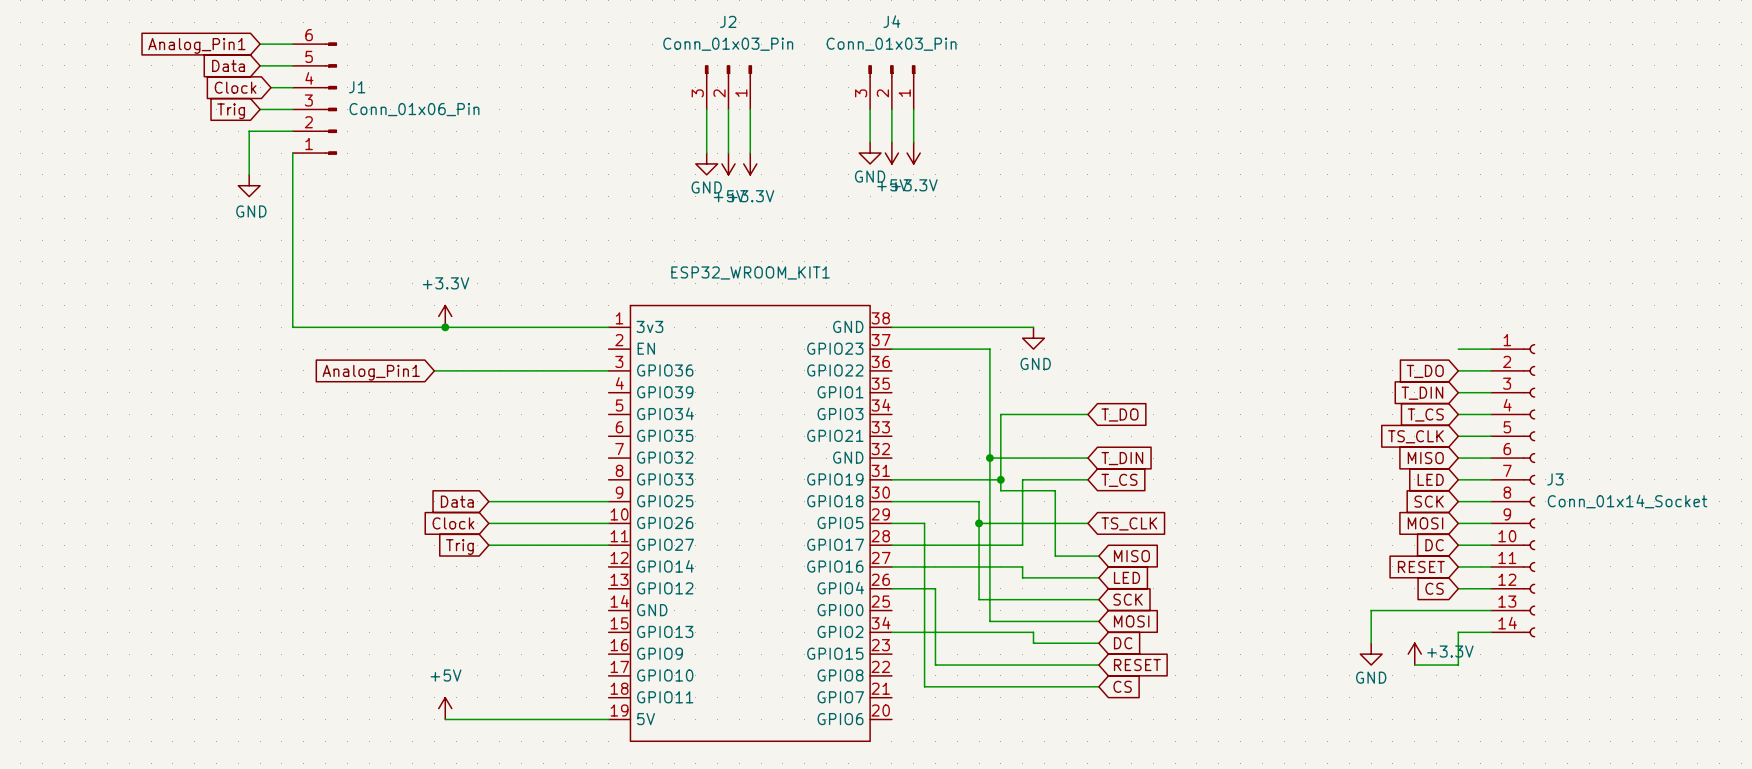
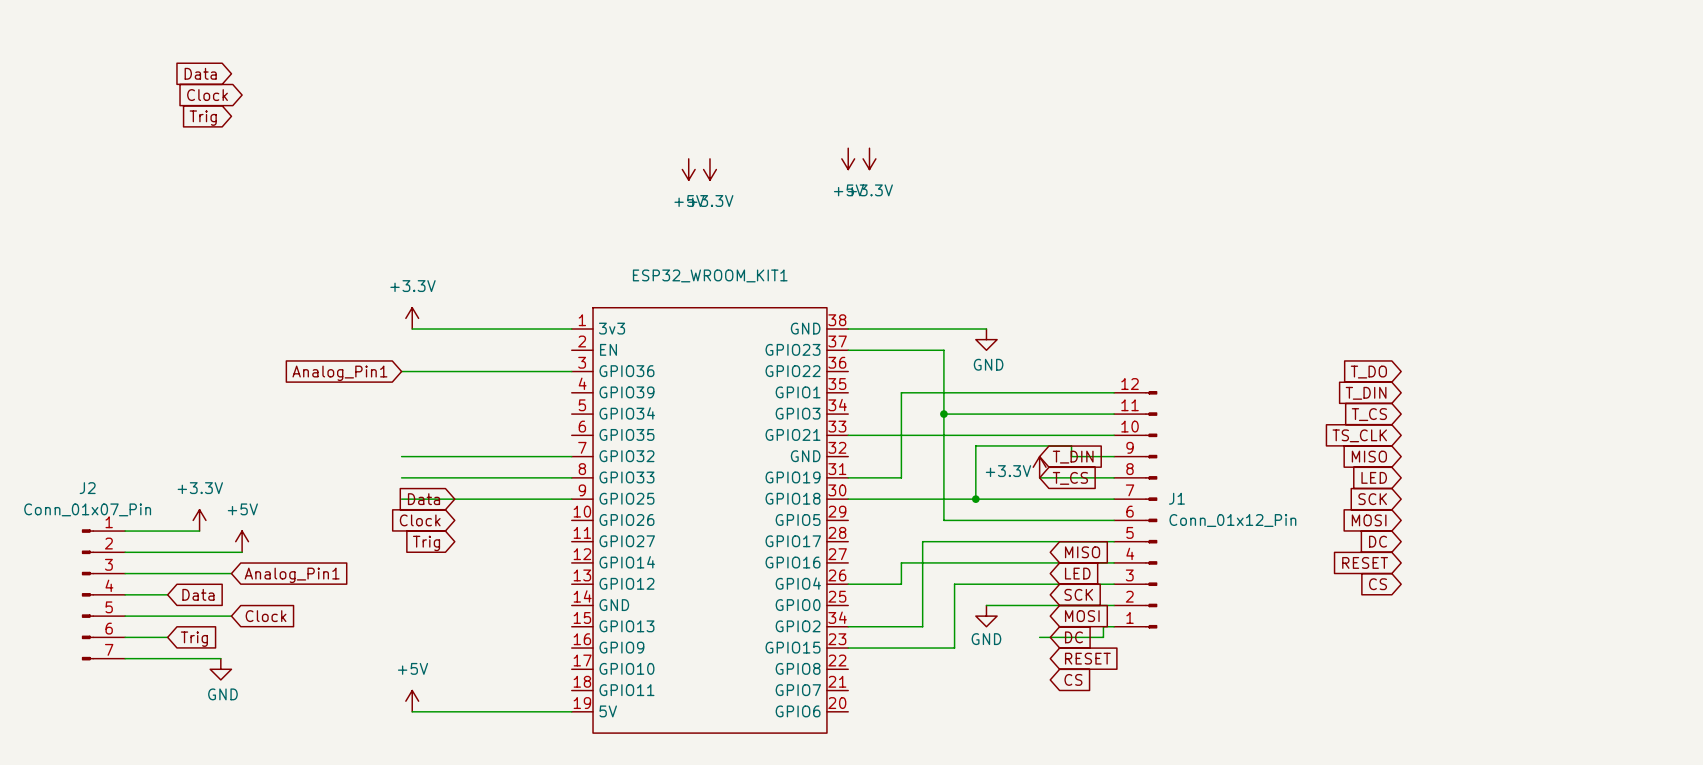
J2 name position: J2 (728, 21) -> J2 (87, 488)
J1 symbol: [292, 42, 337, 155] -> [1114, 391, 1158, 629]
wire: (260, 44) (292, 44) -> none
J2 value: Conn_01x03_Pin (728, 44) -> Conn_01x07_Pin (87, 509)
global label: Analog_Pin1 (196, 45) -> none
wire: (260, 65) (292, 65) -> none
J2 symbol: [704, 65, 753, 110] -> [81, 529, 126, 661]
wire: (270, 87) (292, 87) -> none
J4: Conn_01x03_Pin (891, 87) -> none
wire: (260, 109) (292, 109) -> none
J1 value: Conn_01x06_Pin (414, 109) -> Conn_01x12_Pin (1232, 520)
wire: (706, 109) (706, 153) -> none
wire: (728, 109) (728, 153) -> none
wire: (750, 109) (750, 153) -> none
wire: (870, 109) (870, 142) -> none
wire: (891, 109) (891, 142) -> none
wire: (913, 109) (913, 142) -> none
wire: (292, 131) (249, 131) (249, 174) -> none
wire: (292, 153) (292, 327) (445, 327) -> none
power symbol: GND (870, 153) -> none
power symbol: GND (706, 163) -> none
power symbol: GND (249, 185) -> none
junction: (445, 327) -> none
wire: (1458, 349) (1491, 349) -> none
wire: (1458, 370) (1491, 370) -> none
wire: (1458, 392) (1491, 392) -> none
junction: none -> (943, 414)
wire: (1000, 414) (1000, 490) (1055, 490) (1055, 556) (1098, 556) -> (954, 414) (943, 414)
wire: none -> (1039, 414) (1114, 414)
global label: T_DO (1120, 414) -> none
wire: (1458, 414) (1491, 414) -> none
wire: none -> (848, 435) (1114, 435)
wire: (1458, 436) (1491, 436) -> none
wire: none -> (401, 456) (571, 456)
wire: (989, 458) (1087, 458) -> none
junction: (989, 458) -> none
wire: (1458, 458) (1491, 458) -> none
power symbol: none -> +3.3V (1039, 467)
wire: none -> (401, 477) (571, 477)
wire: (946, 479) (1000, 479) -> (901, 477) (901, 392) (1114, 392)
junction: (1000, 479) -> none
wire: (1022, 479) (1087, 479) -> (975, 477) (975, 445) (1071, 445) (1071, 456) (1114, 456)
wire: none -> (1039, 477) (1114, 477)
wire: (1458, 479) (1491, 479) -> none
J3: Conn_01x14_Socket (1513, 490) -> none
wire: none -> (401, 499) (454, 499)
wire: (979, 501) (979, 599) (1098, 599) -> (933, 499) (1114, 499)
wire: (1022, 501) (1022, 545) -> (1114, 541) (975, 541)
junction: none -> (975, 499)
wire: (1458, 501) (1491, 501) -> none
power symbol: none -> +3.3V (199, 520)
wire: (488, 523) (608, 523) -> none
wire: (891, 523) (924, 523) (924, 686) (1098, 686) -> none
wire: (979, 523) (989, 523) (989, 621) (1098, 621) -> none
junction: (979, 523) -> none
wire: none -> (1039, 520) (1114, 520)
global label: TS_CLK (1129, 523) -> none
wire: (1458, 523) (1491, 523) -> none
wire: none -> (125, 531) (199, 531)
power symbol: none -> +5V (242, 541)
wire: (488, 545) (608, 545) -> none
wire: (891, 545) (968, 545) -> (922, 626) (922, 541)
wire: (1458, 545) (1491, 545) -> none
wire: none -> (125, 552) (242, 552)
wire: (891, 566) (946, 566) -> (890, 584) (901, 584) (901, 562)
wire: (1022, 566) (1022, 577) (1098, 577) -> (975, 562) (1114, 562)
wire: (1458, 566) (1491, 566) -> none
wire: none -> (125, 573) (231, 573)
global label: none -> Analog_Pin1 (292, 575)
wire: (935, 588) (935, 665) (1098, 665) -> none
wire: none -> (1114, 584) (954, 584) (954, 648) (848, 648)
wire: (1458, 588) (1491, 588) -> none
wire: none -> (125, 594) (167, 594)
global label: none -> Data (198, 594)
wire: none -> (986, 605) (1114, 605)
wire: (1491, 610) (1371, 610) (1371, 643) -> none
wire: none -> (125, 616) (231, 616)
global label: none -> Clock (266, 616)
power symbol: none -> GND (986, 616)
wire: (968, 632) (1033, 632) (1033, 643) (1087, 643) -> none
wire: none -> (1114, 626) (1103, 626) (1103, 637) (1050, 637)
wire: (1491, 632) (1458, 632) (1458, 665) (1414, 665) -> none
wire: none -> (125, 637) (167, 637)
global label: none -> Trig (194, 639)
power symbol: GND (1371, 654) -> none
power symbol: +3.3V (1414, 654) -> none
wire: none -> (125, 658) (220, 658)
power symbol: none -> GND (220, 669)

